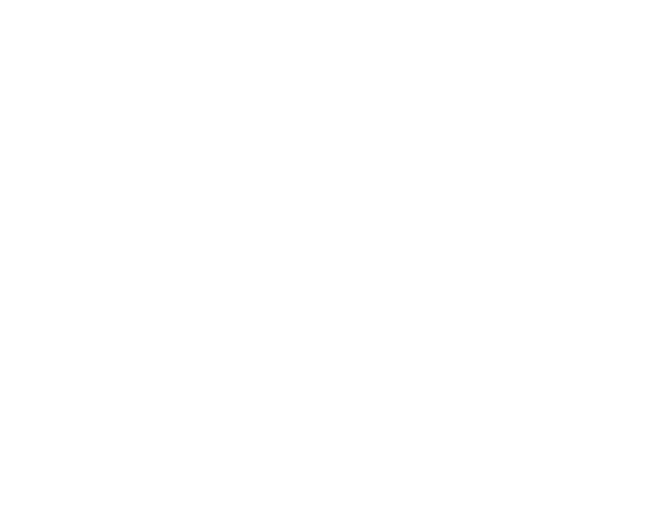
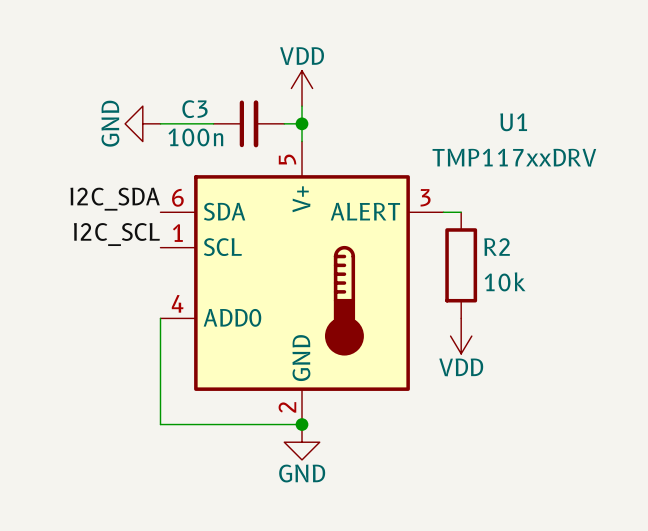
power symbol: none -> VDD (302, 88)
wire: none -> (302, 106) (302, 141)
power symbol: none -> GND (142, 123)
wire: none -> (160, 123) (213, 123)
C3: none -> 100n (248, 123)
wire: none -> (284, 123) (302, 123)
junction: none -> (302, 123)
label: none -> I2C_SDA (115, 199)
wire: none -> (443, 212) (461, 212)
label: none -> I2C_SCL (116, 234)
R2: none -> 10k (461, 265)
U1: none -> TMP117xxDRV (302, 283)
wire: none -> (160, 318) (160, 424) (302, 424)
power symbol: none -> VDD (461, 336)
junction: none -> (302, 424)
power symbol: none -> GND (302, 442)

